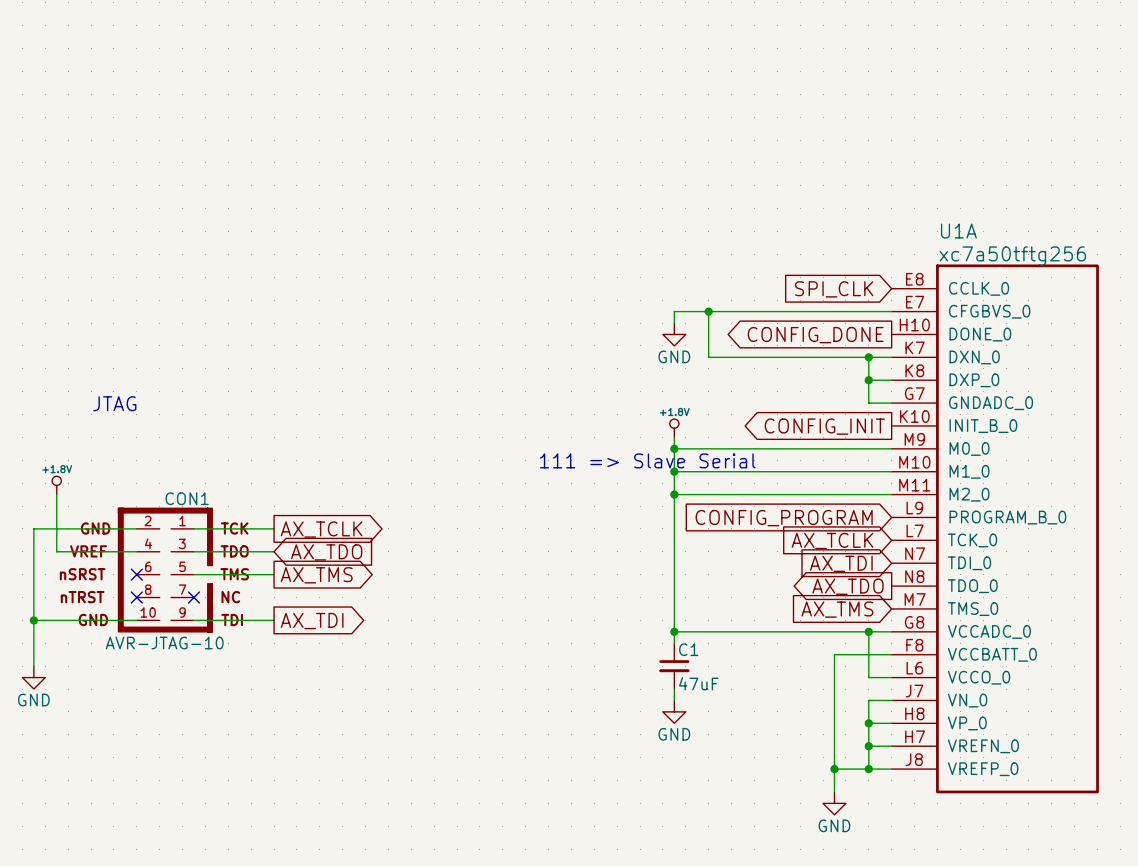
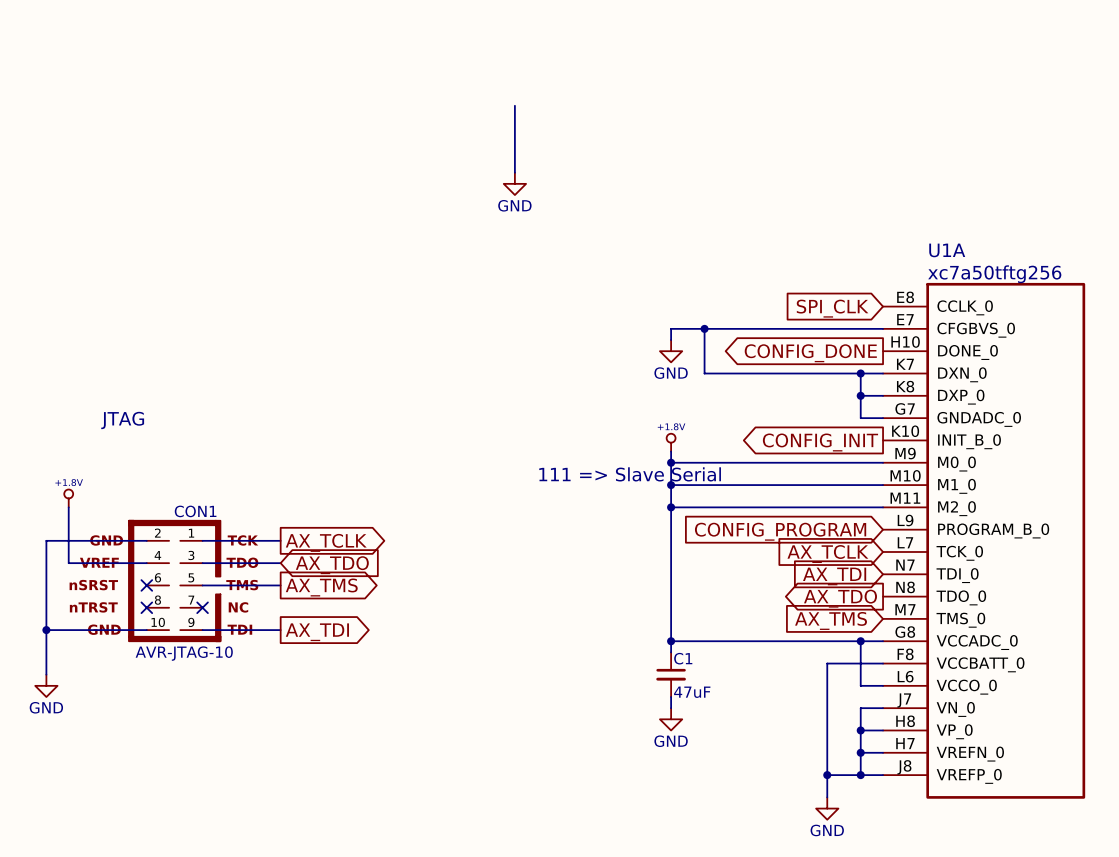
wire: none -> (514, 105) (514, 172)
power symbol: none -> GND (514, 183)

